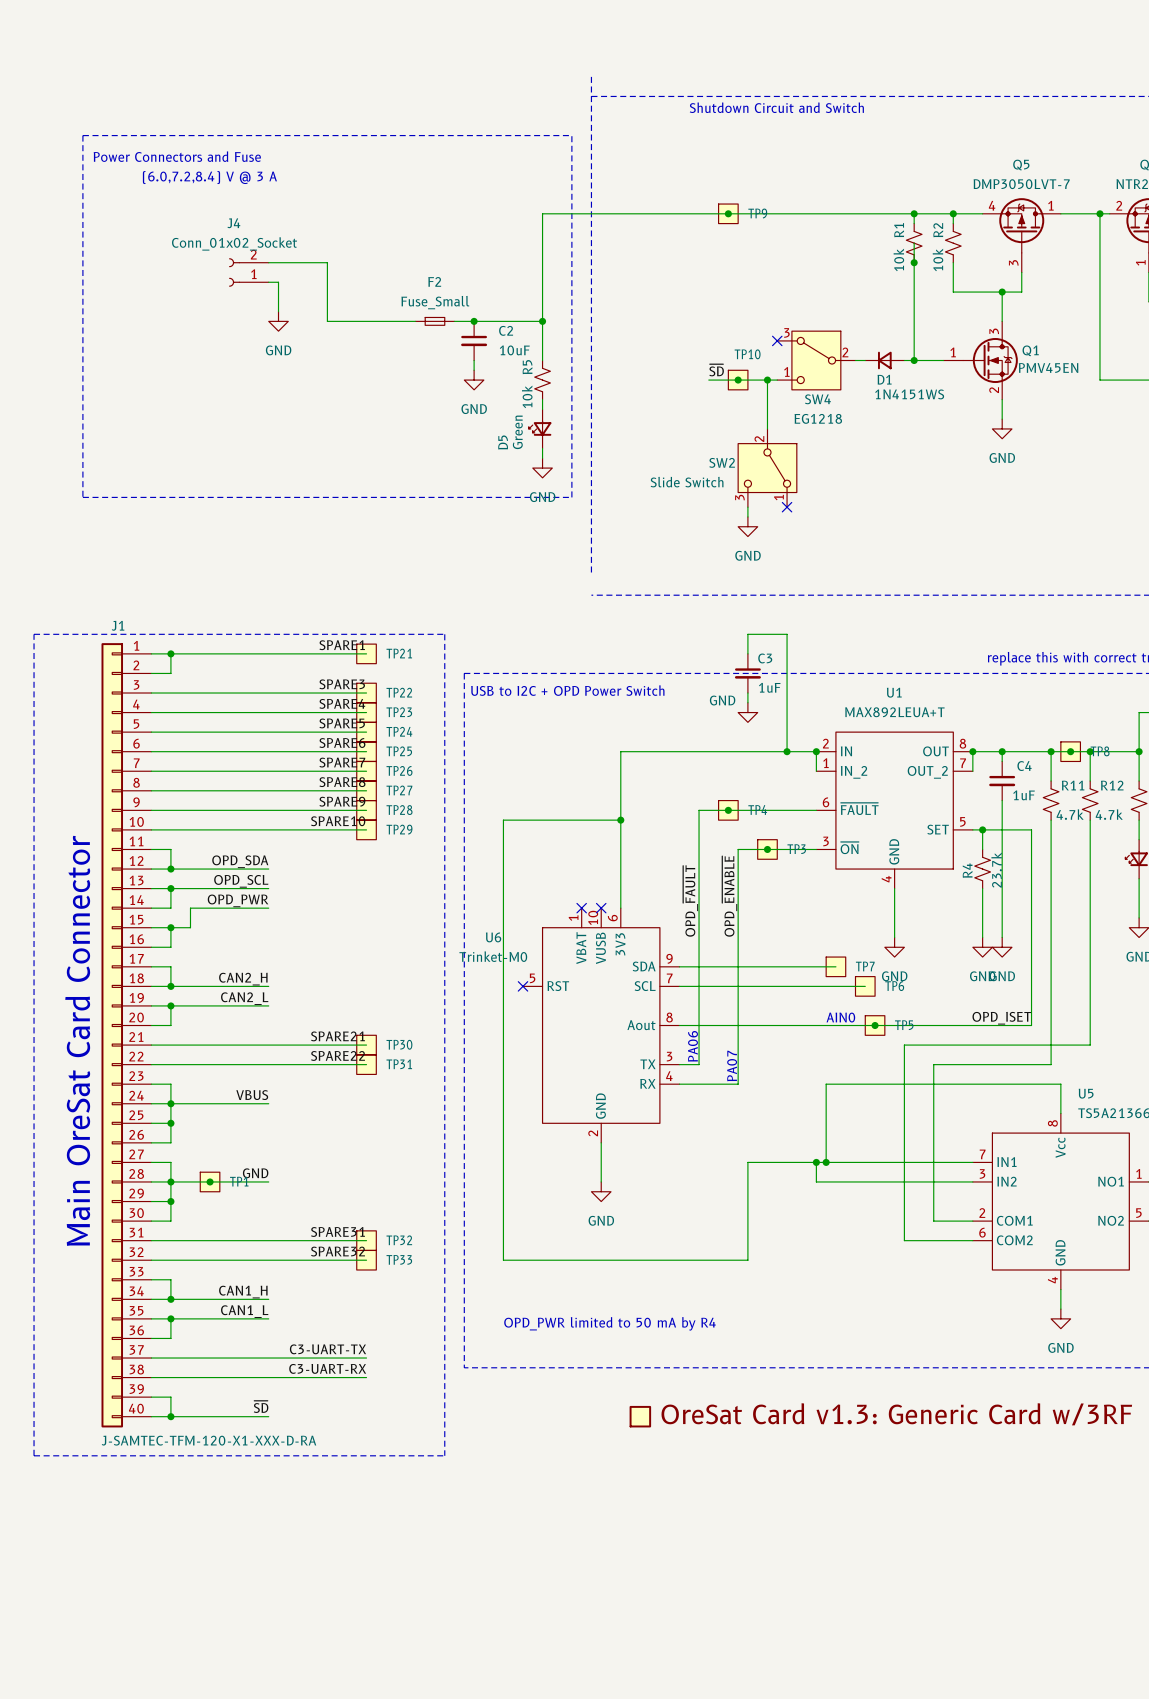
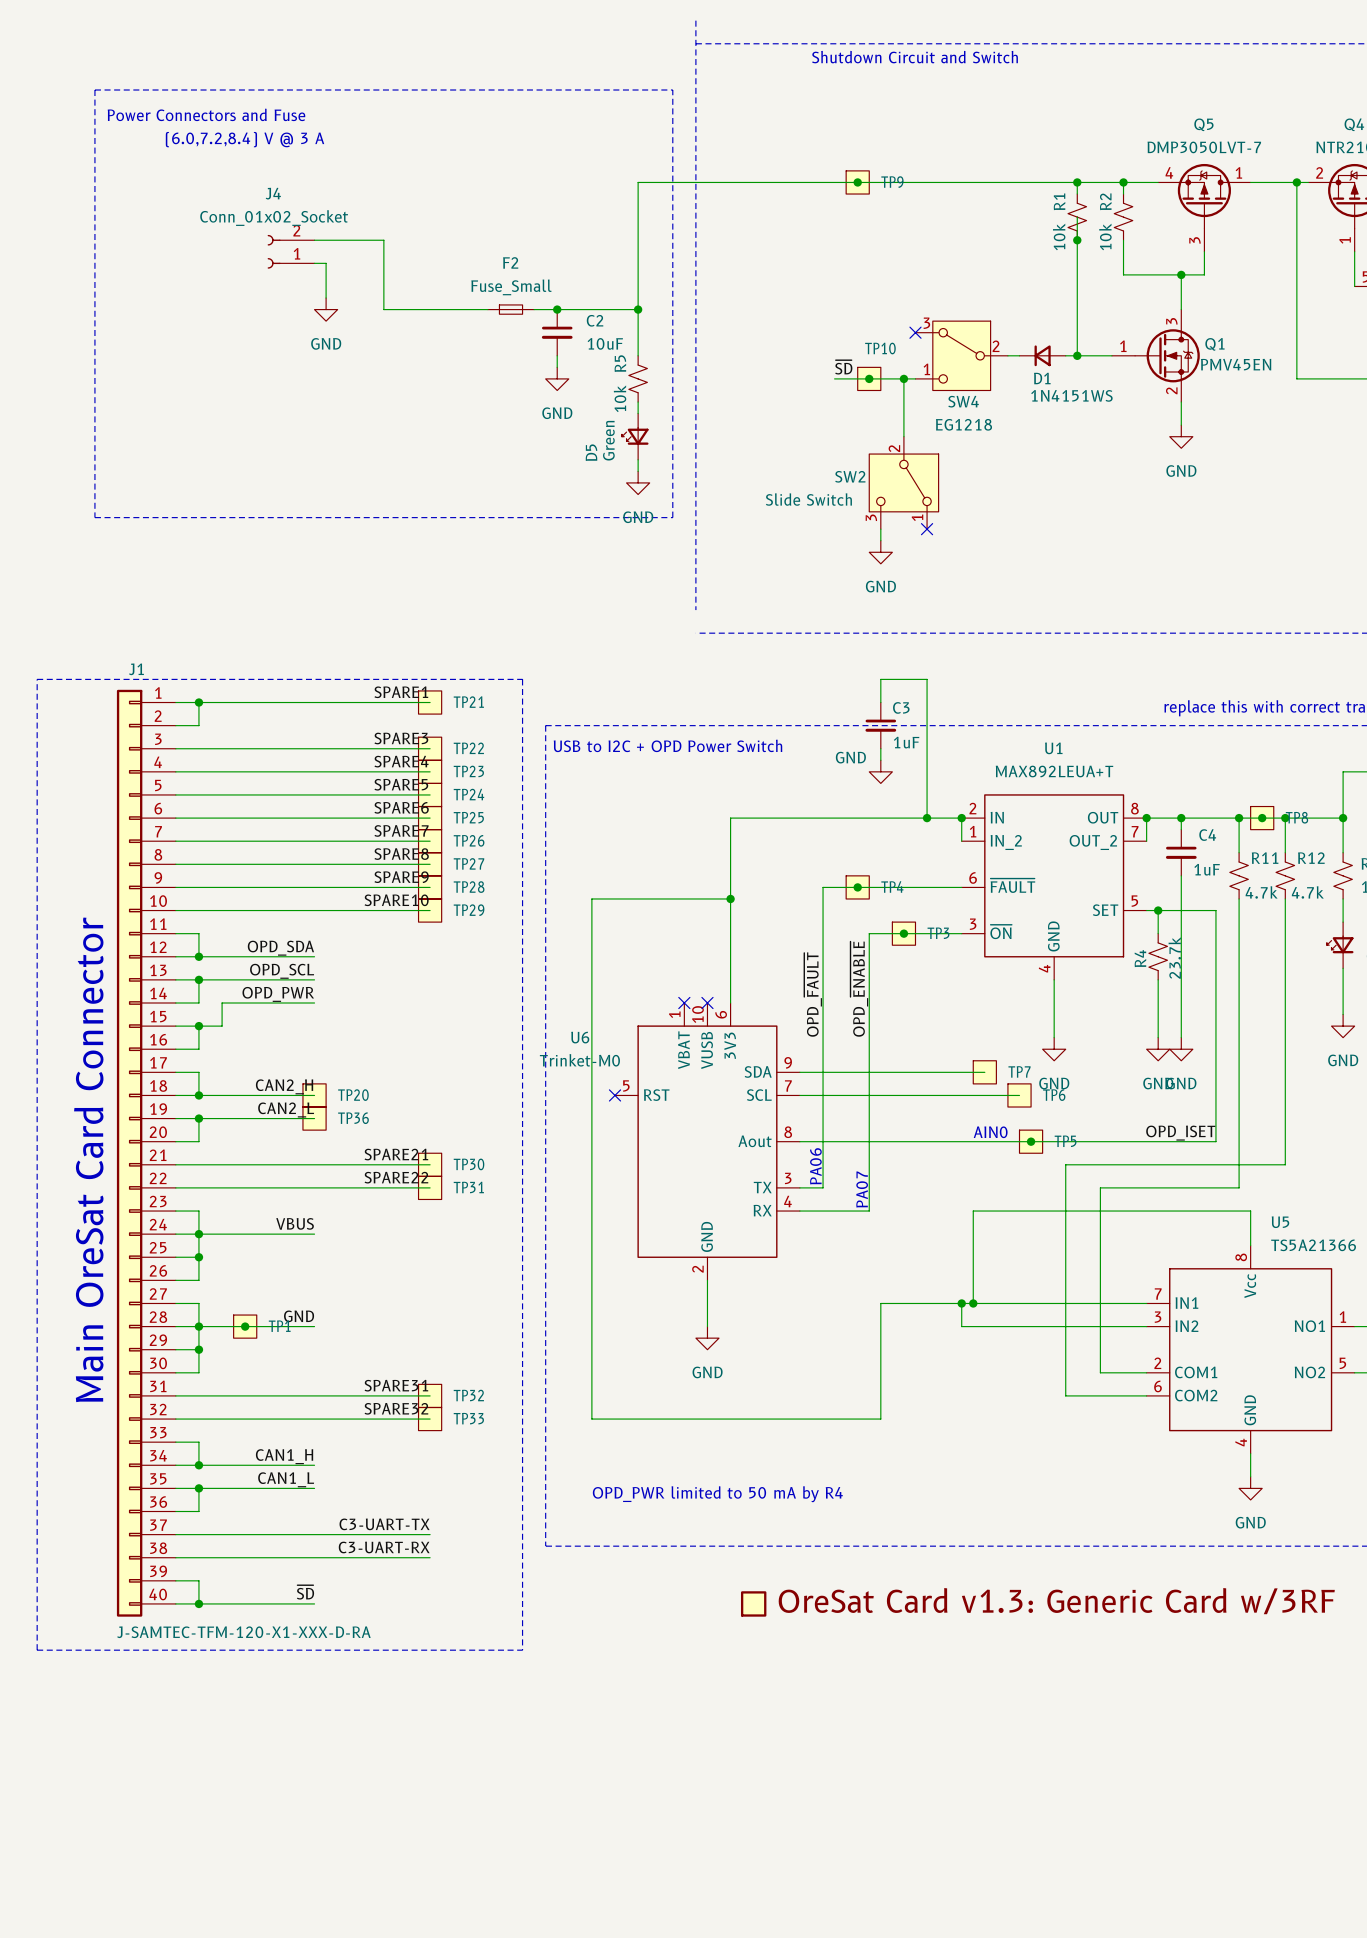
TP20: none -> (314, 1095)
TP36: none -> (314, 1118)

